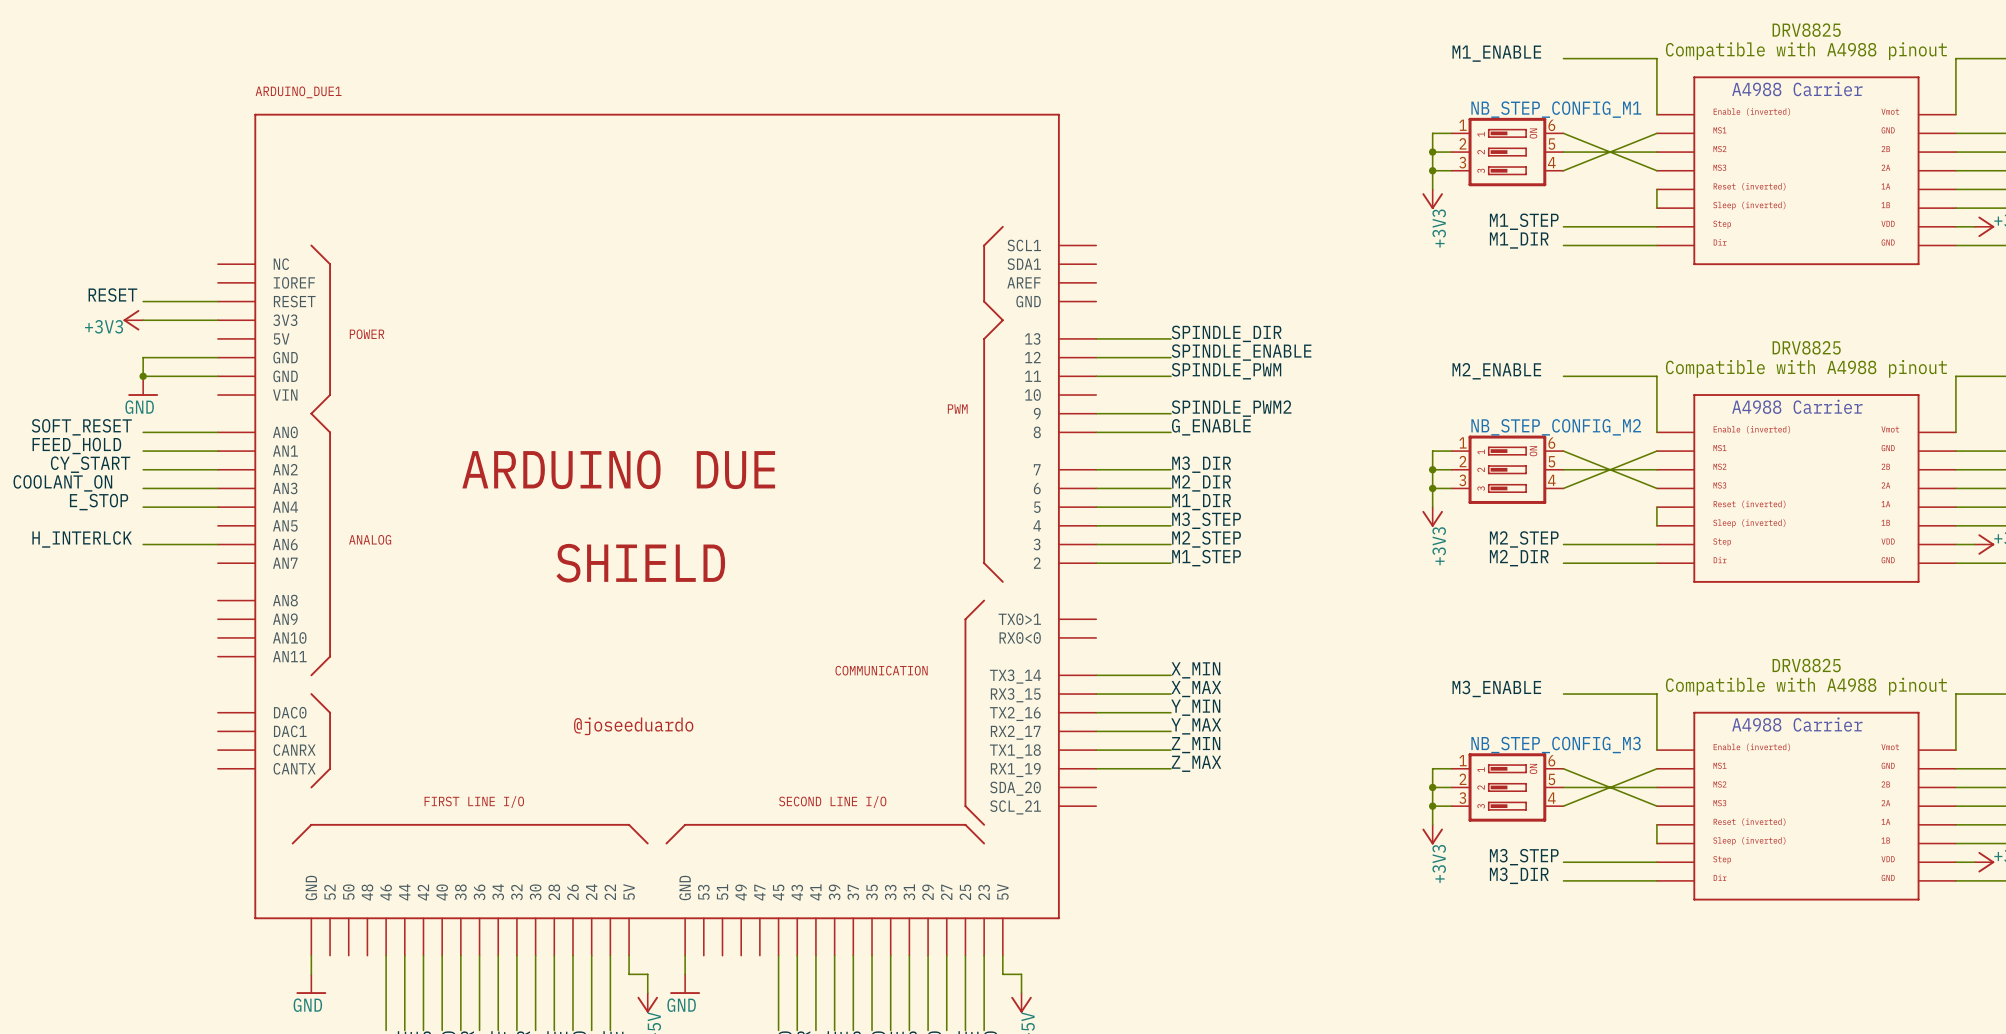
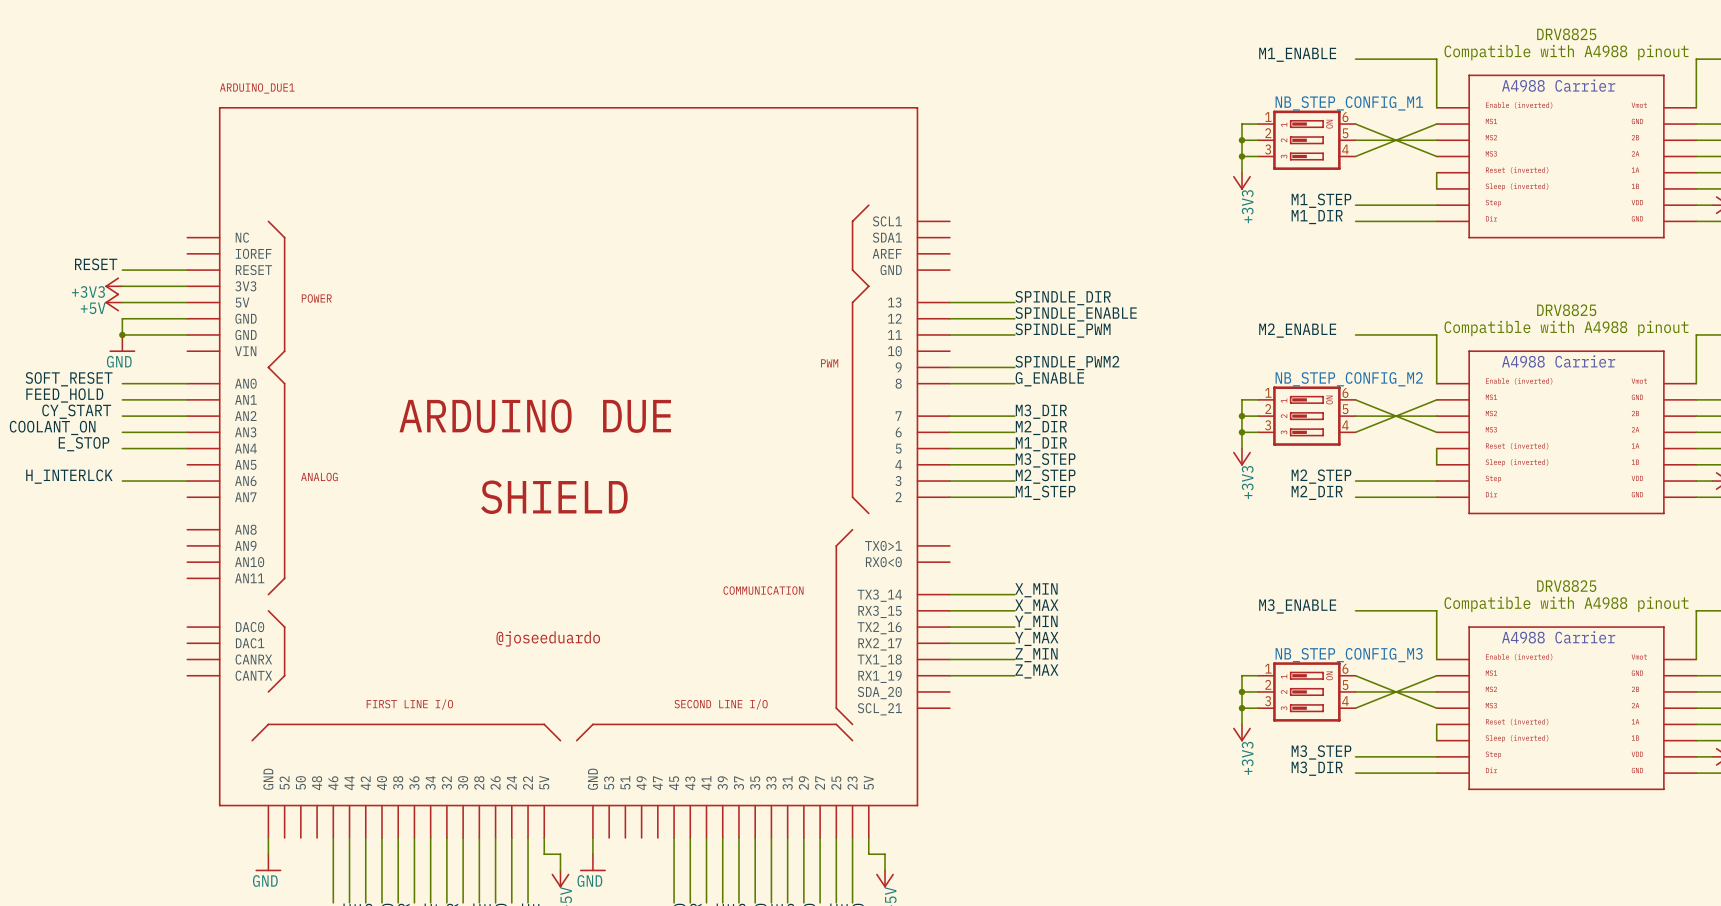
power symbol: none -> +5V (113, 302)
wire: none -> (122, 302) (187, 302)

